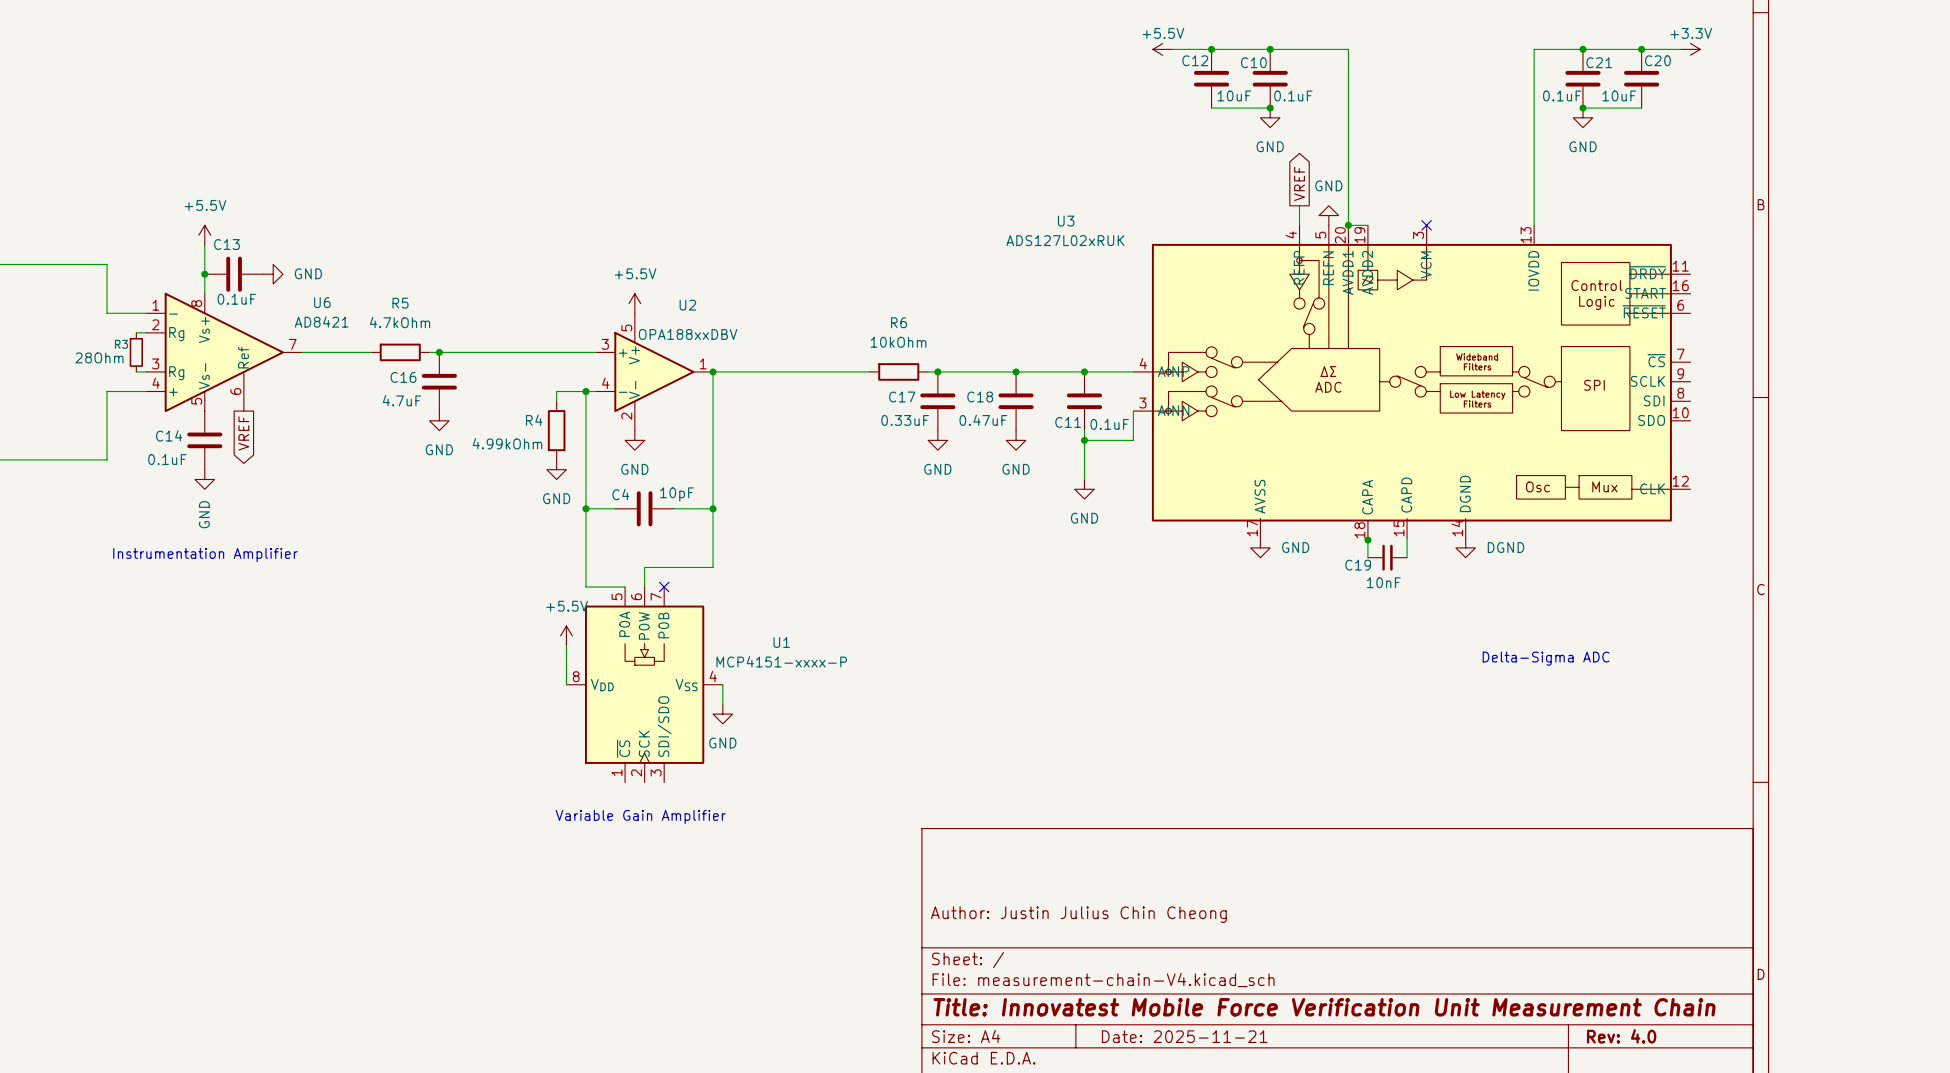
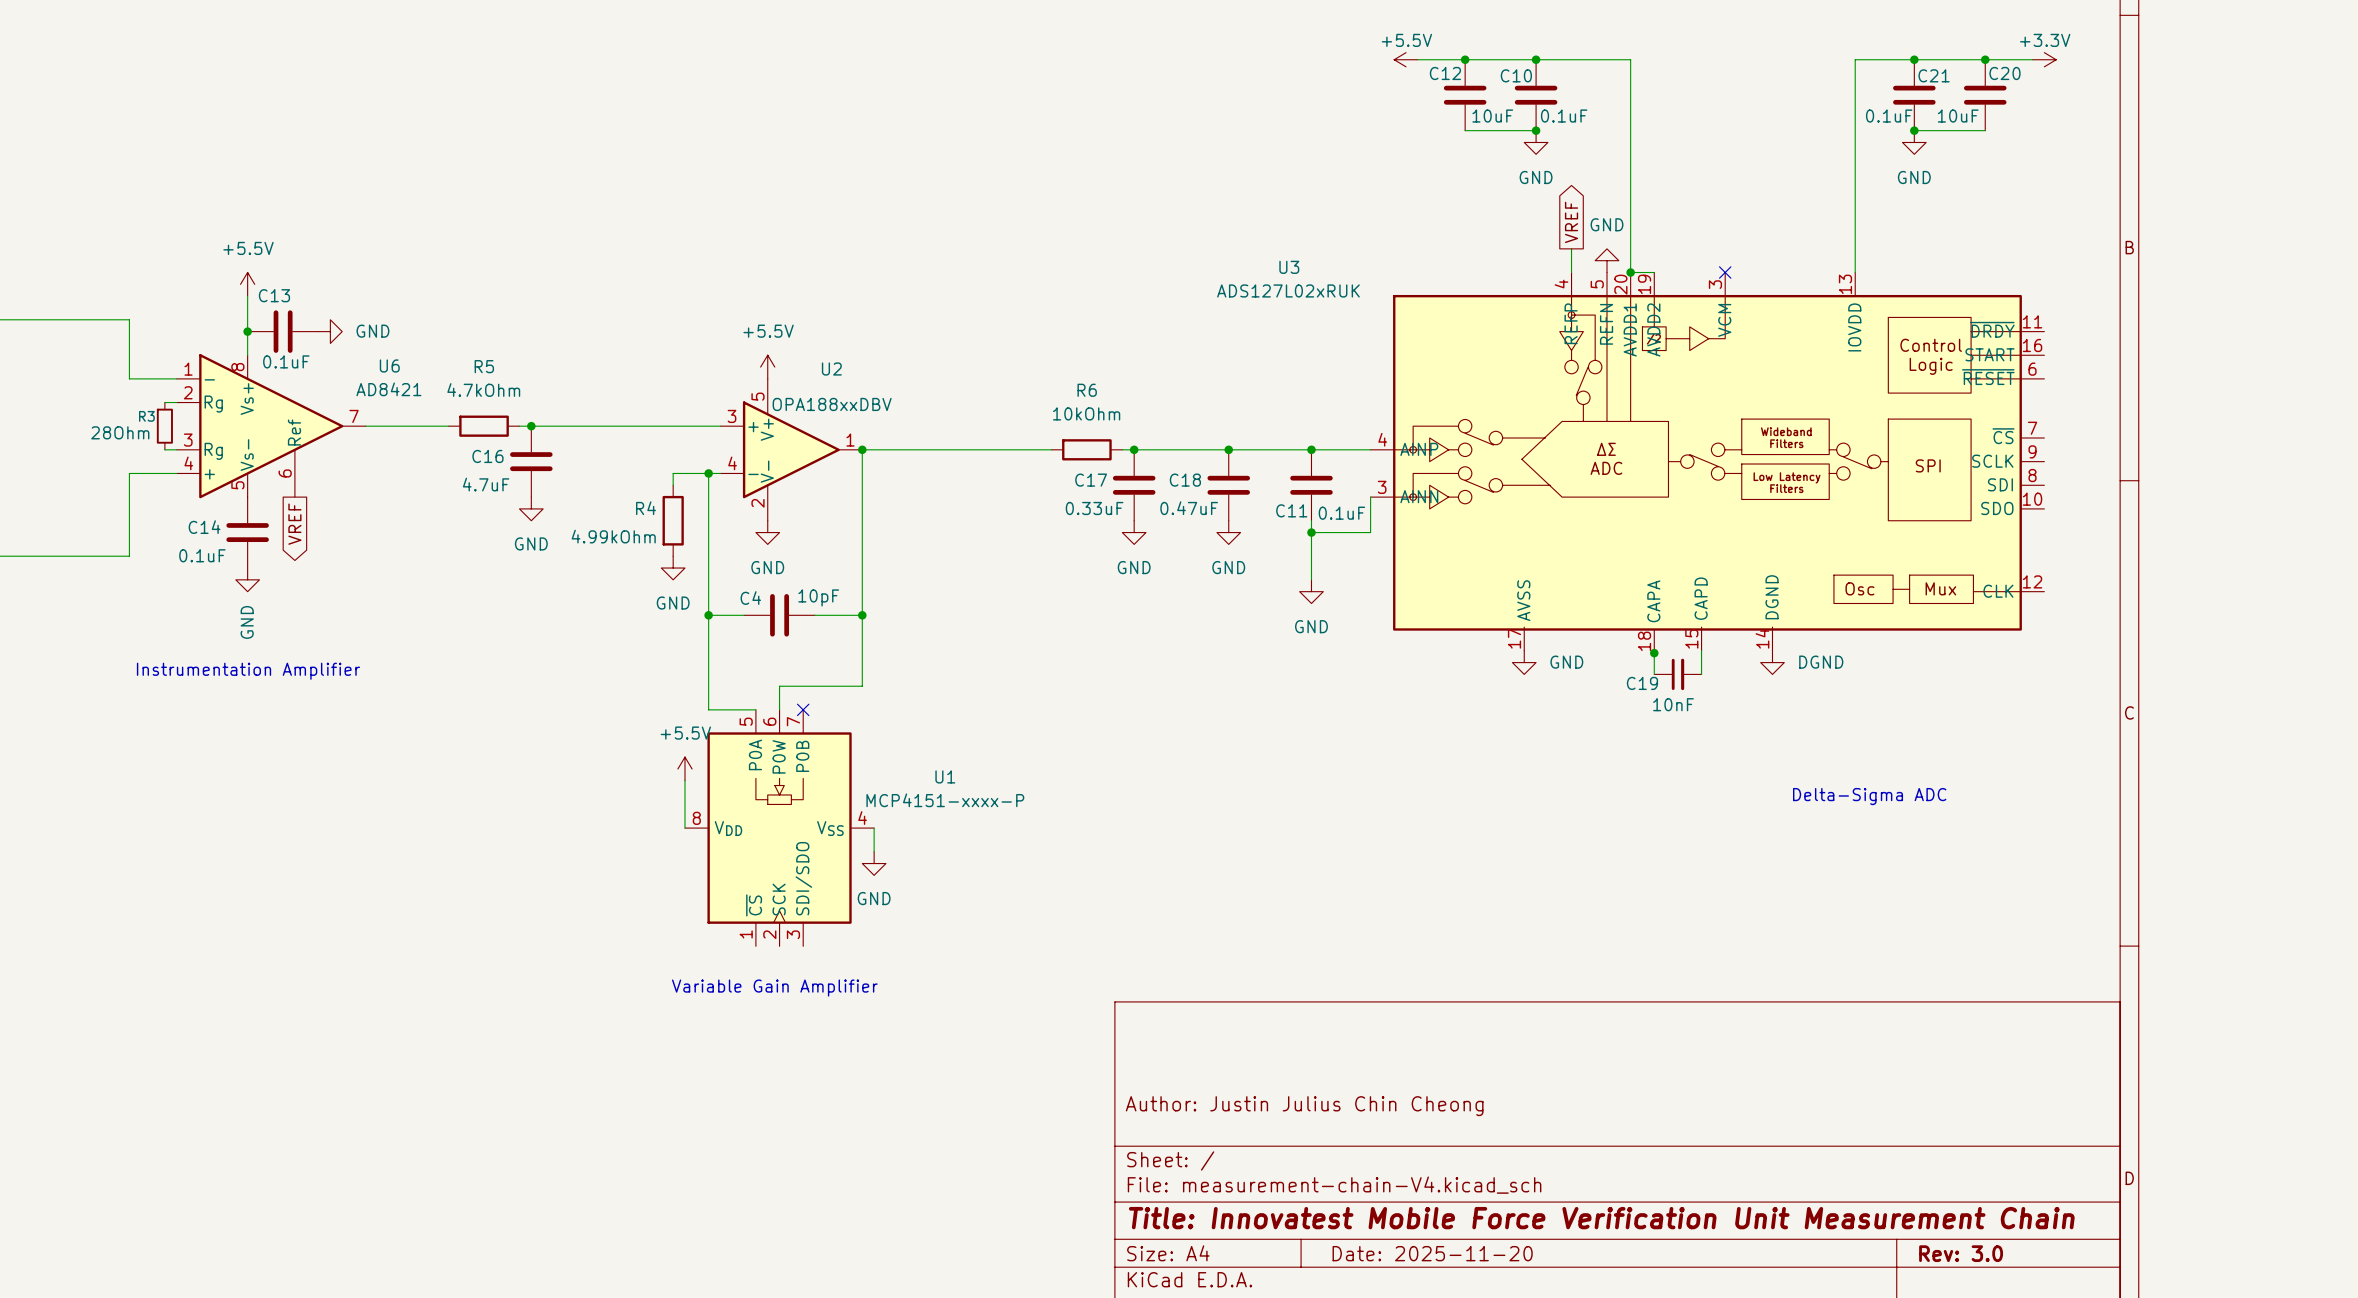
title block: Date: 2025-11-21 (1184, 1036) -> Date: 2025-11-20 (1432, 1253)
title block: Rev: 4.0 (1621, 1036) -> Rev: 3.0 (1961, 1253)

